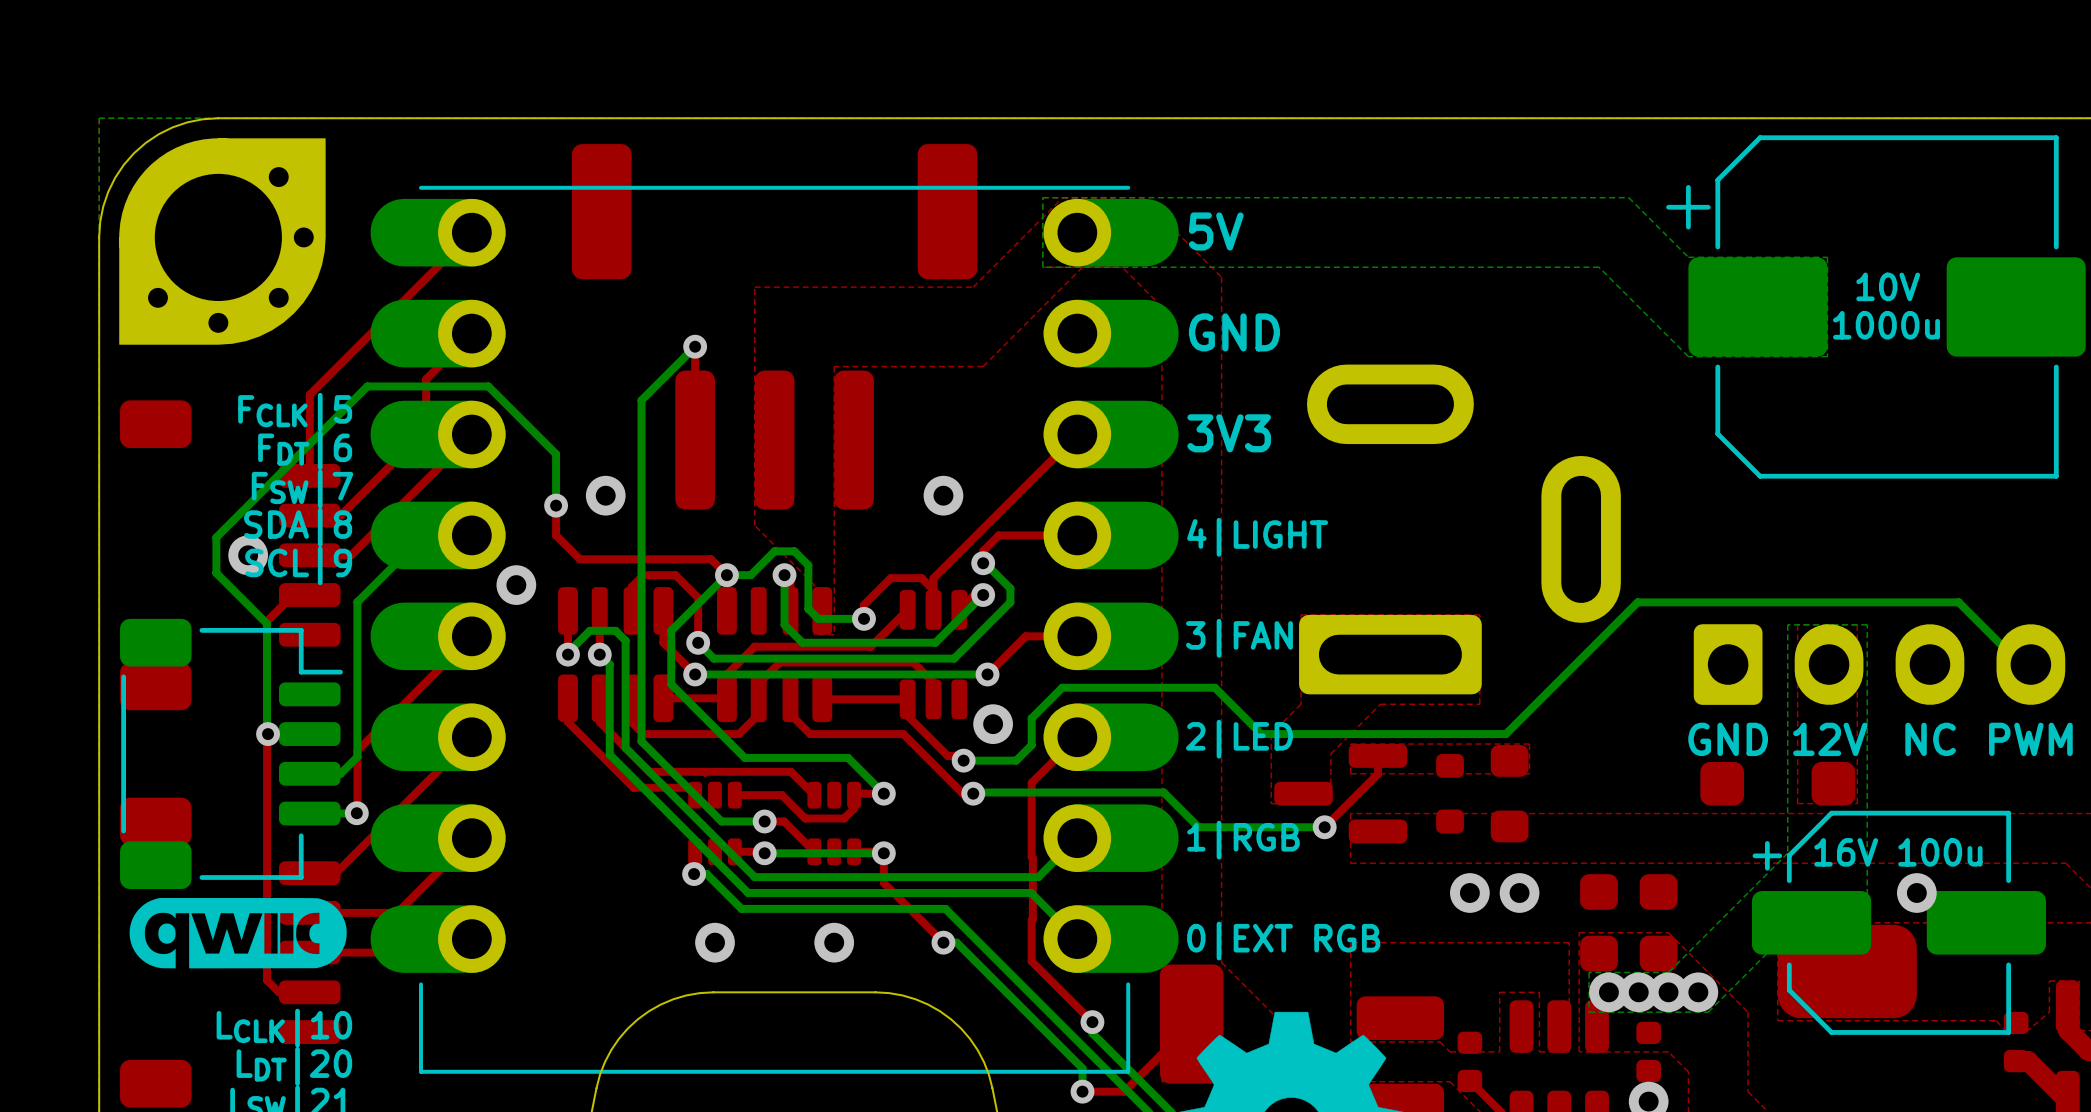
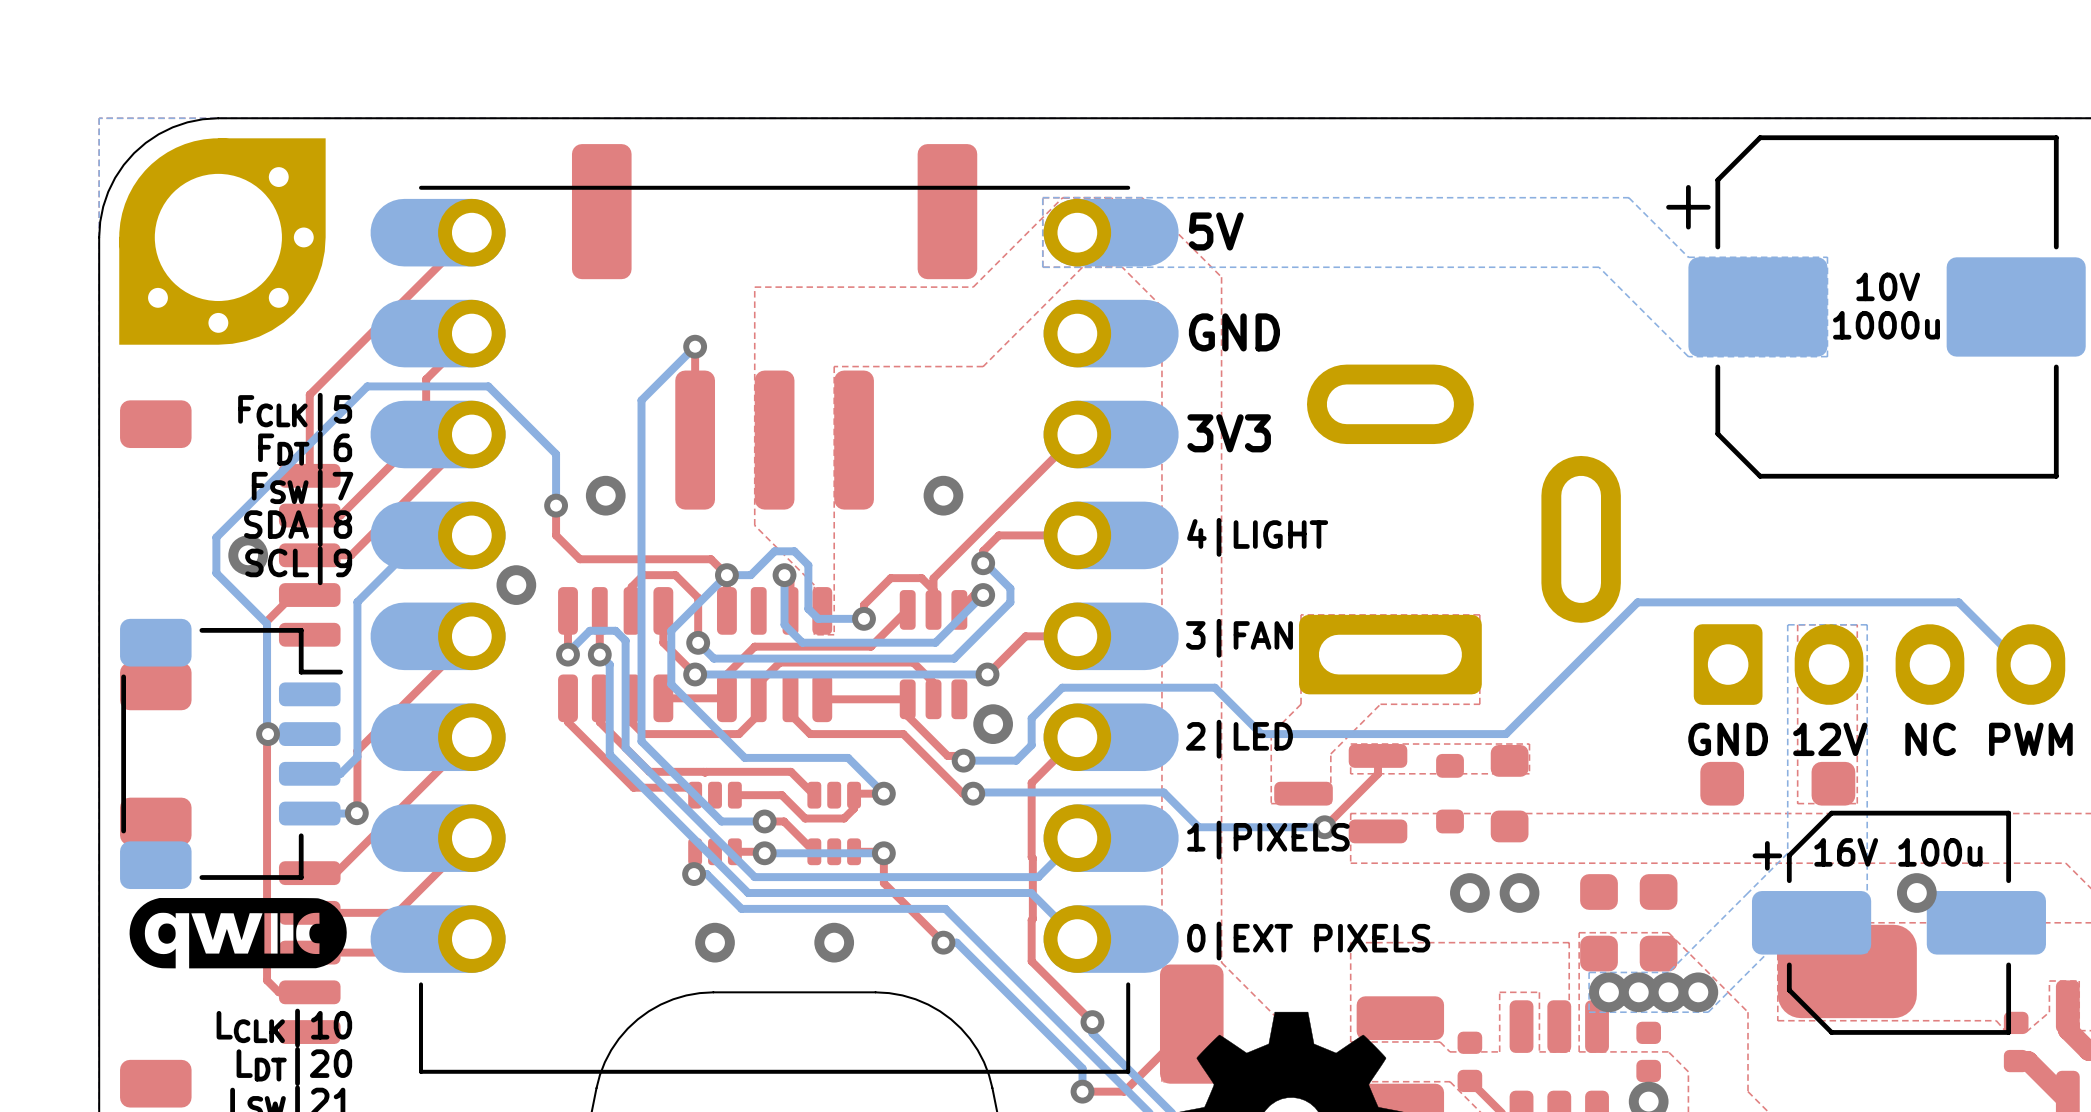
text: 1|RGB (1243, 840) -> 1|PIXELS (1268, 840)
text: 0|EXT RGB (1283, 941) -> 0|EXT PIXELS (1308, 941)

